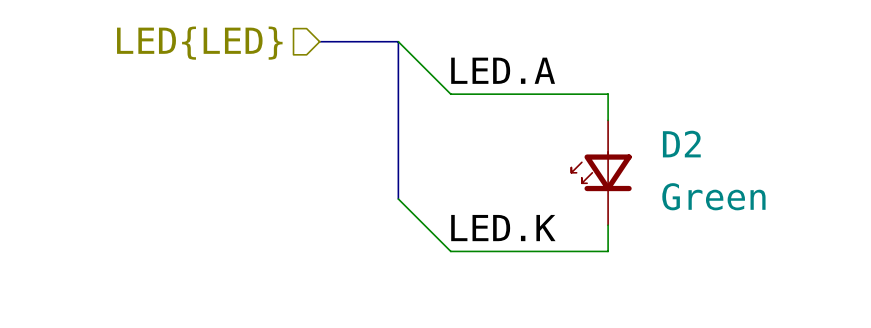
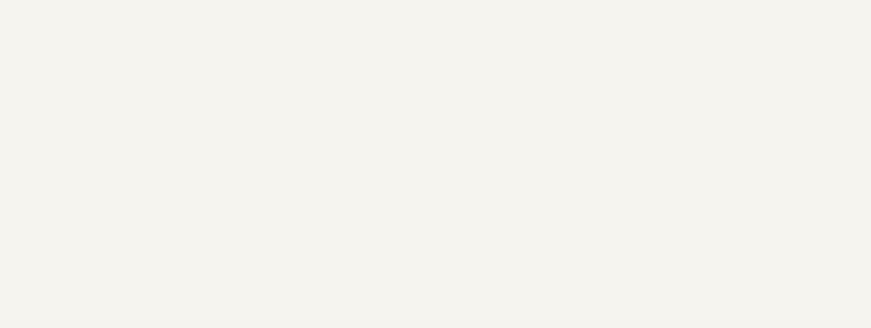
bus: (319, 41) (398, 41) (398, 199) -> none
wire: (398, 41) (450, 94) (608, 94) (608, 120) -> none
hierarchical label: LED{LED} (199, 43) -> none
label: LED.A (503, 70) -> none
D2: Green (601, 172) -> none
wire: (398, 199) (450, 251) (608, 251) (608, 225) -> none
label: LED.K (503, 228) -> none

